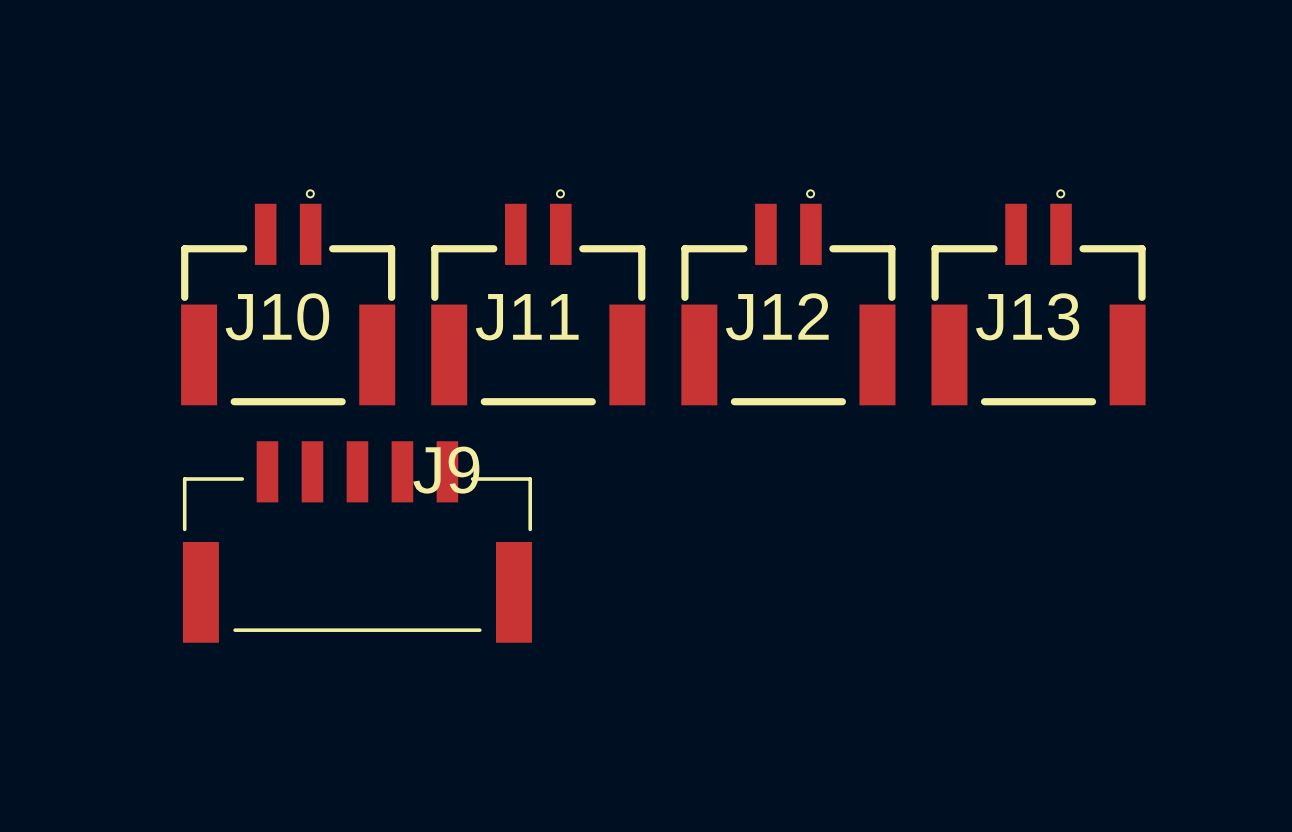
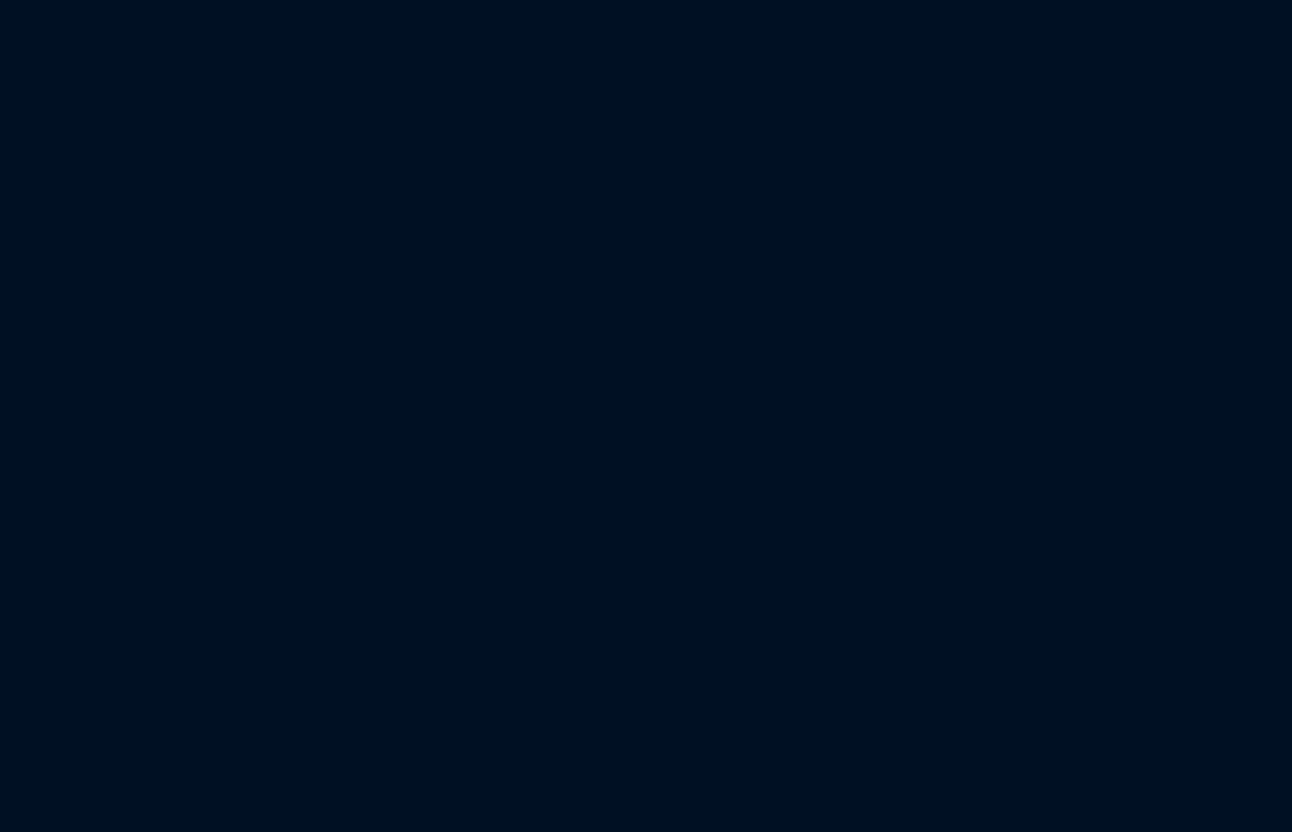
J10: (288, 297) -> none
J11: (538, 297) -> none
J12: (788, 297) -> none
J13: (1038, 297) -> none
J9: (357, 541) -> none

